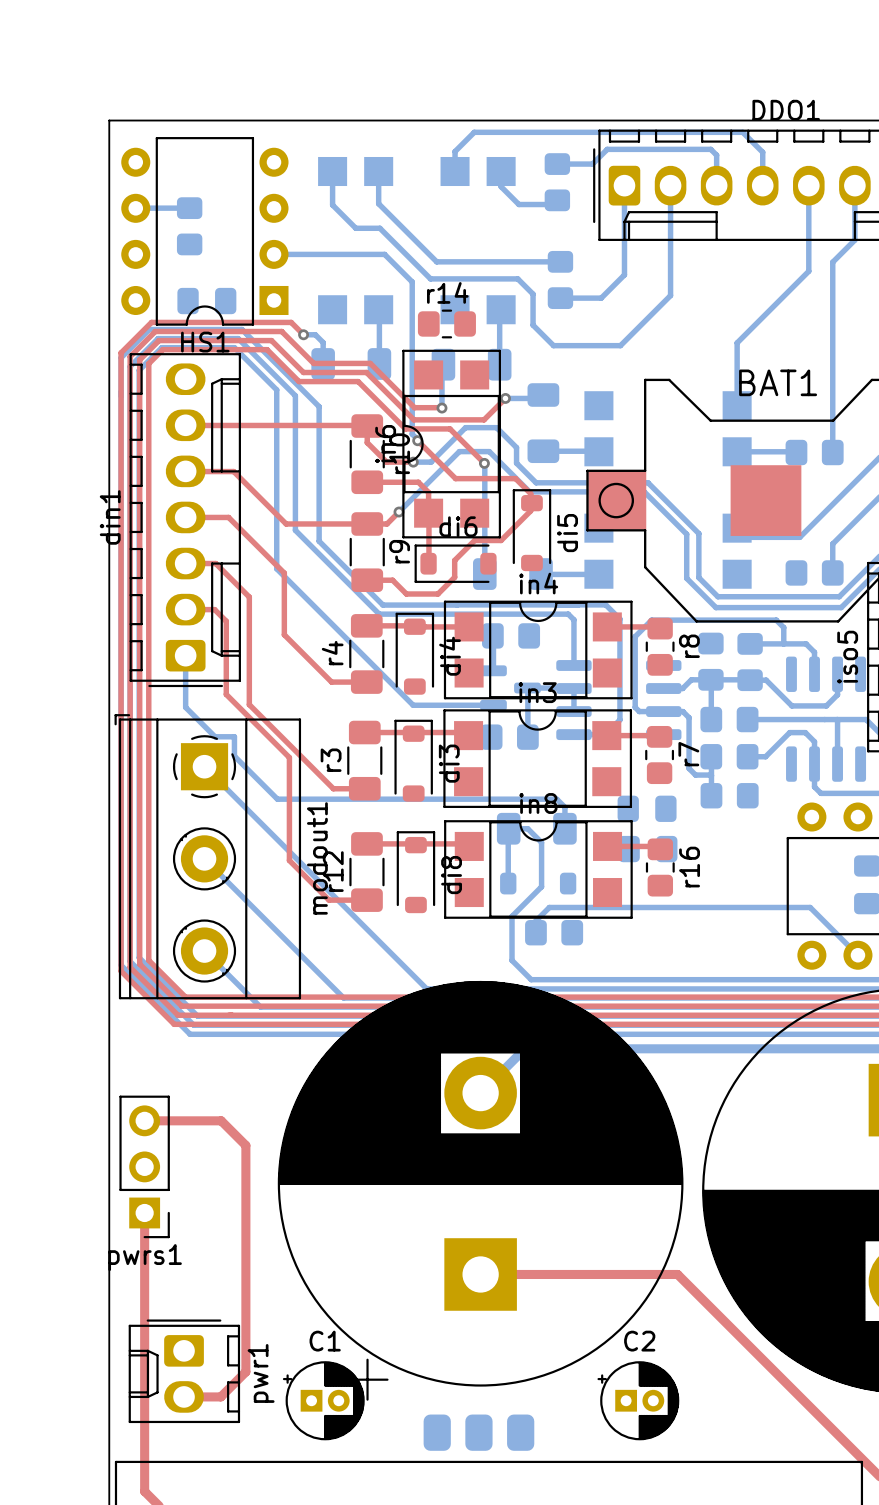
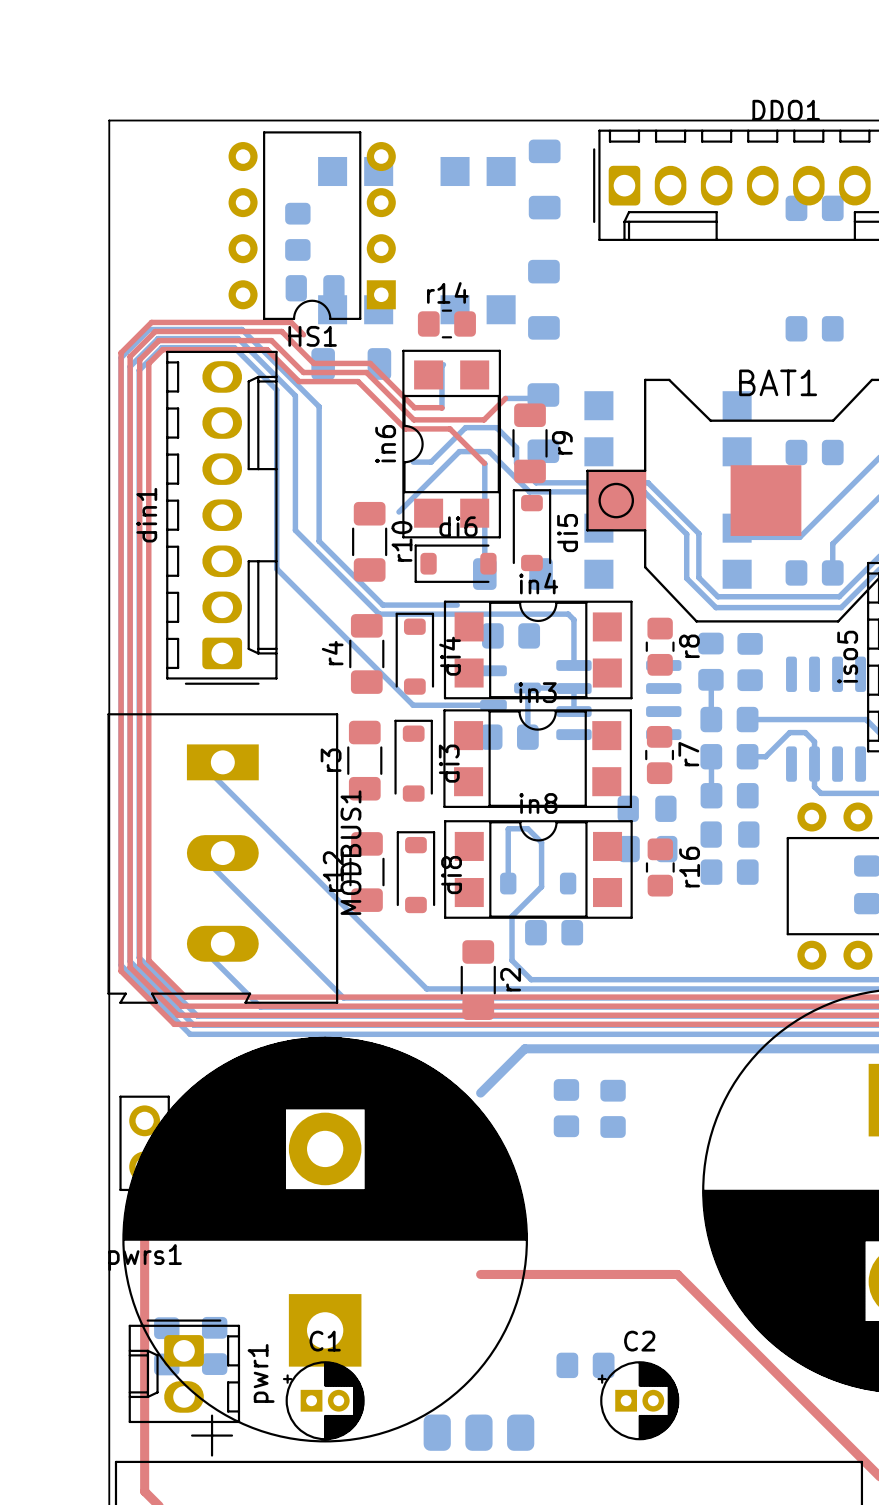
part footprint: [544, 153, 571, 212] -> [528, 139, 561, 220]
bottom track: (557, 164) (592, 164) (607, 149) (710, 149) (716, 155) (716, 185) -> none
bottom track: (464, 168) (461, 171) (455, 171) (455, 151) (474, 132) (742, 132) (762, 152) (762, 185) -> none
bottom track: (332, 171) (332, 205) (355, 228) (379, 228) (430, 278) (517, 278) (533, 294) (533, 325) (553, 345) (620, 345) (670, 295) (670, 185) -> none
bottom track: (378, 171) (378, 203) (436, 261) (560, 261) -> none
bottom track: (501, 171) (501, 186) (518, 204) (557, 204) -> none
bottom track: (624, 185) (624, 274) (601, 298) (560, 298) -> none
bottom track: (808, 185) (808, 271) (737, 342) (737, 405) -> none
bottom track: (854, 185) (854, 240) (832, 262) (832, 452) -> none
bottom track: (135, 208) (189, 208) -> none
part: none -> (814, 208)
part position: (189, 226) -> (297, 231)
HS1 position: (204, 231) -> (312, 225)
bottom track: (274, 254) (384, 254) (412, 281) (412, 434) (417, 440) -> none
part: (560, 279) -> none
part position: (206, 301) -> (315, 288)
bottom track: (378, 309) (379, 363) -> none
bottom track: (501, 309) (499, 364) -> none
part: none -> (814, 328)
bottom track: (303, 334) (315, 334) (323, 342) (323, 363) -> none
via: (303, 334) -> none
part rotation: 0° (471, 364) -> 90° clockwise (543, 299)
part position: (471, 364) -> (543, 299)
via: (505, 398) -> none
via: (441, 408) -> none
top track: (185, 425) (366, 425) (367, 442) (386, 462) (413, 462) -> none
top track: (417, 440) (455, 478) (515, 478) (530, 493) (530, 510) (501, 540) (474, 540) (454, 560) (454, 577) (437, 594) (406, 594) (392, 580) (367, 580) -> none
via: (417, 440) -> none
bottom track: (543, 451) (598, 451) -> none
bottom track: (737, 451) (796, 452) -> none
r10 position: (367, 454) -> (369, 541)
via: (413, 462) -> none
via: (484, 463) -> none
top track: (185, 471) (233, 471) (286, 523) (387, 523) (398, 512) -> none
top track: (367, 482) (418, 482) (428, 492) (428, 570) -> none
via: (398, 512) -> none
top track: (185, 517) (228, 517) (284, 573) (284, 634) (331, 682) (366, 682) -> none
din1 position: (185, 520) -> (221, 517)
r9 position: (367, 552) -> (530, 443)
top track: (185, 563) (215, 563) (249, 597) (249, 704) (333, 788) (364, 788) -> none
bottom track: (542, 574) (598, 574) -> none
bottom track: (457, 604) (605, 604) (619, 619) (619, 719) (605, 734) (573, 734) -> none
top track: (185, 609) (214, 609) (226, 621) (226, 694) (289, 757) (289, 860) (329, 900) (366, 900) -> none
top track: (366, 625) (411, 625) (414, 622) (420, 622) (424, 626) (469, 626) -> none
top track: (607, 626) (658, 626) (660, 628) -> none
bottom track: (492, 635) (493, 670) -> none
bottom track: (750, 643) (806, 643) (814, 652) (814, 674) -> none
bottom track: (783, 643) (783, 627) (776, 620) (651, 620) (635, 636) (635, 707) (639, 711) (682, 711) (689, 717) (689, 768) (695, 775) (711, 775) -> none
bottom track: (185, 655) (185, 707) (215, 736) (234, 736) (234, 756) (277, 799) (556, 799) (564, 807) (564, 828) -> none
bottom track: (837, 674) (837, 694) (826, 705) (791, 705) (766, 680) (691, 679) (682, 688) (663, 688) -> none
bottom track: (837, 719) (837, 764) -> none
top track: (364, 732) (465, 732) (468, 735) -> none
top track: (606, 735) (659, 736) -> none
r2 side: bottom (536, 828) -> top (478, 980)
part: none -> (729, 834)
top track: (366, 843) (466, 843) (469, 846) -> none
top track: (607, 846) (657, 846) (660, 849) -> none
modout1: (207, 856) -> none
MODBUS1: none -> (222, 858)
part: none -> (729, 872)
bottom track: (535, 932) (535, 920) (549, 907) (810, 907) (857, 955) -> none
part: none -> (566, 1108)
part: none -> (613, 1108)
top track: (144, 1120) (221, 1120) (245, 1145) (245, 1371) (220, 1396) (184, 1396) -> none
part position: (480, 1190) -> (325, 1246)
part: none -> (214, 1345)
part: none -> (166, 1346)
part: none -> (585, 1365)

